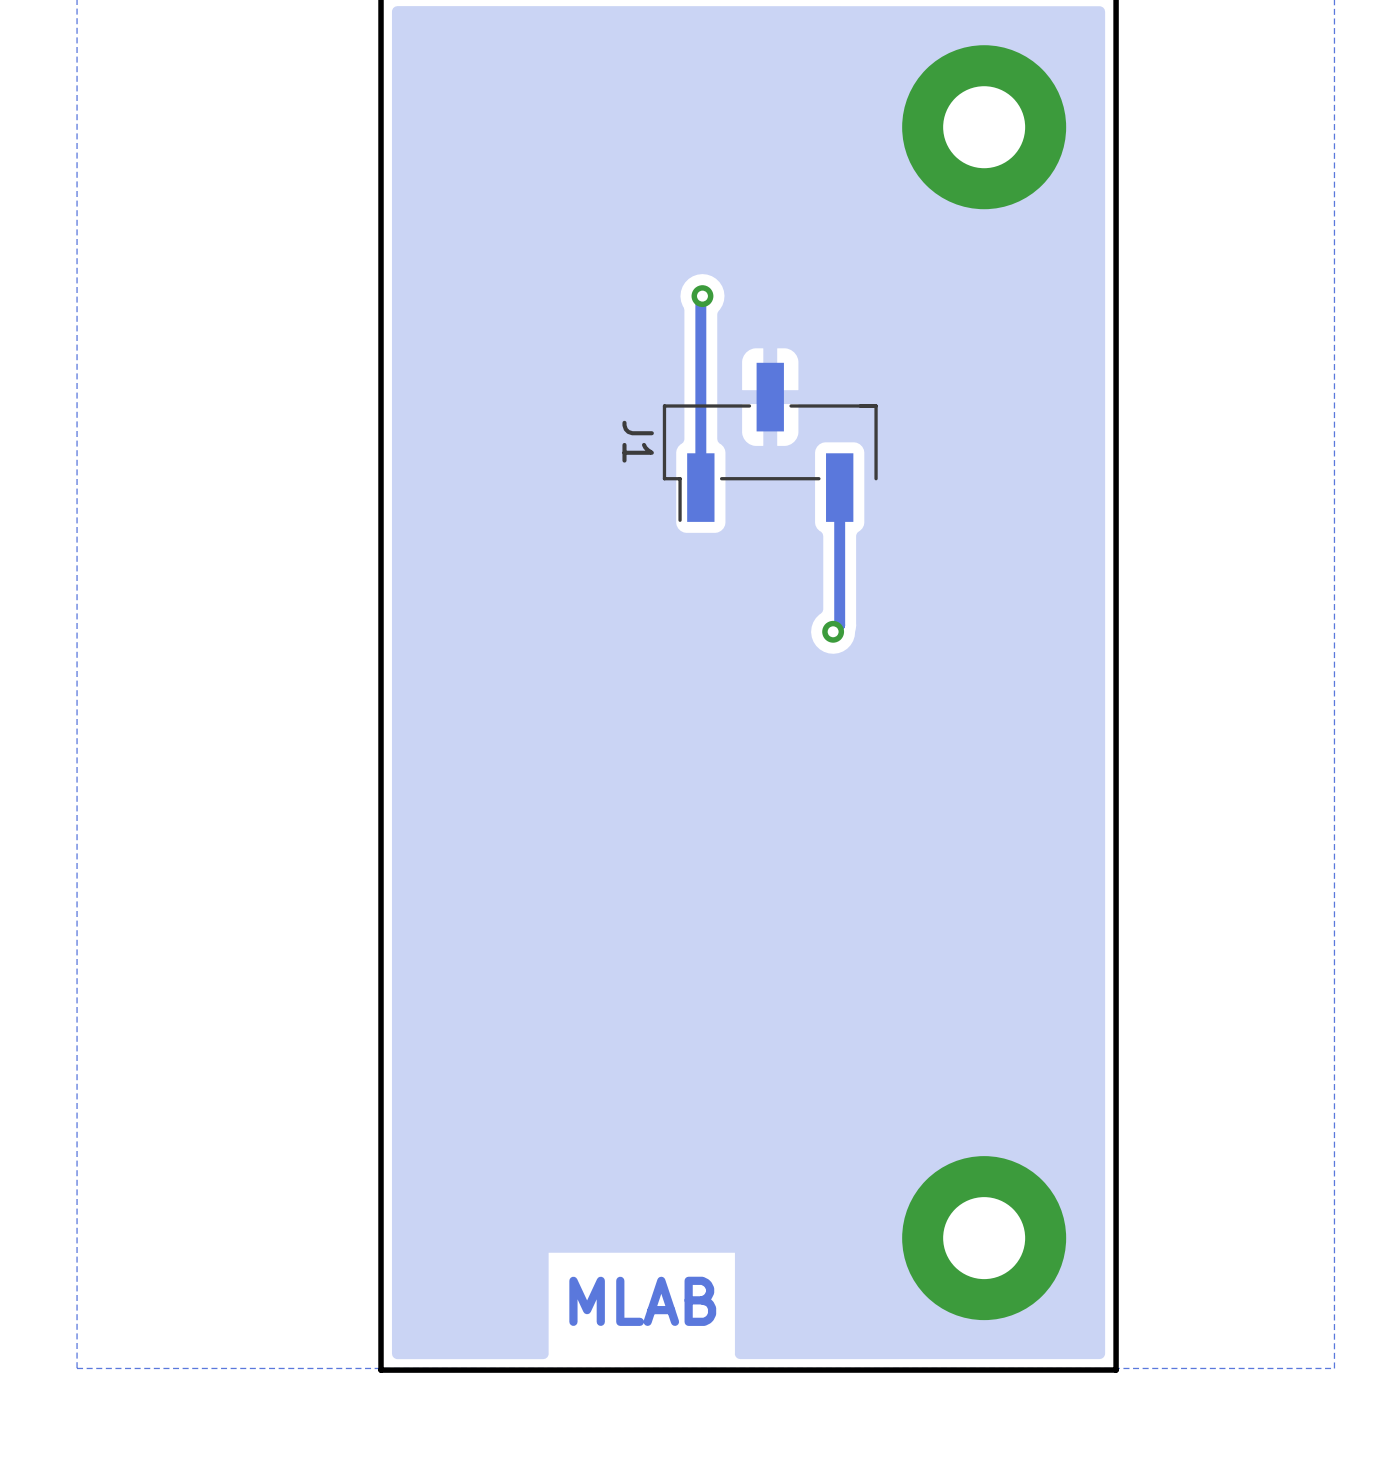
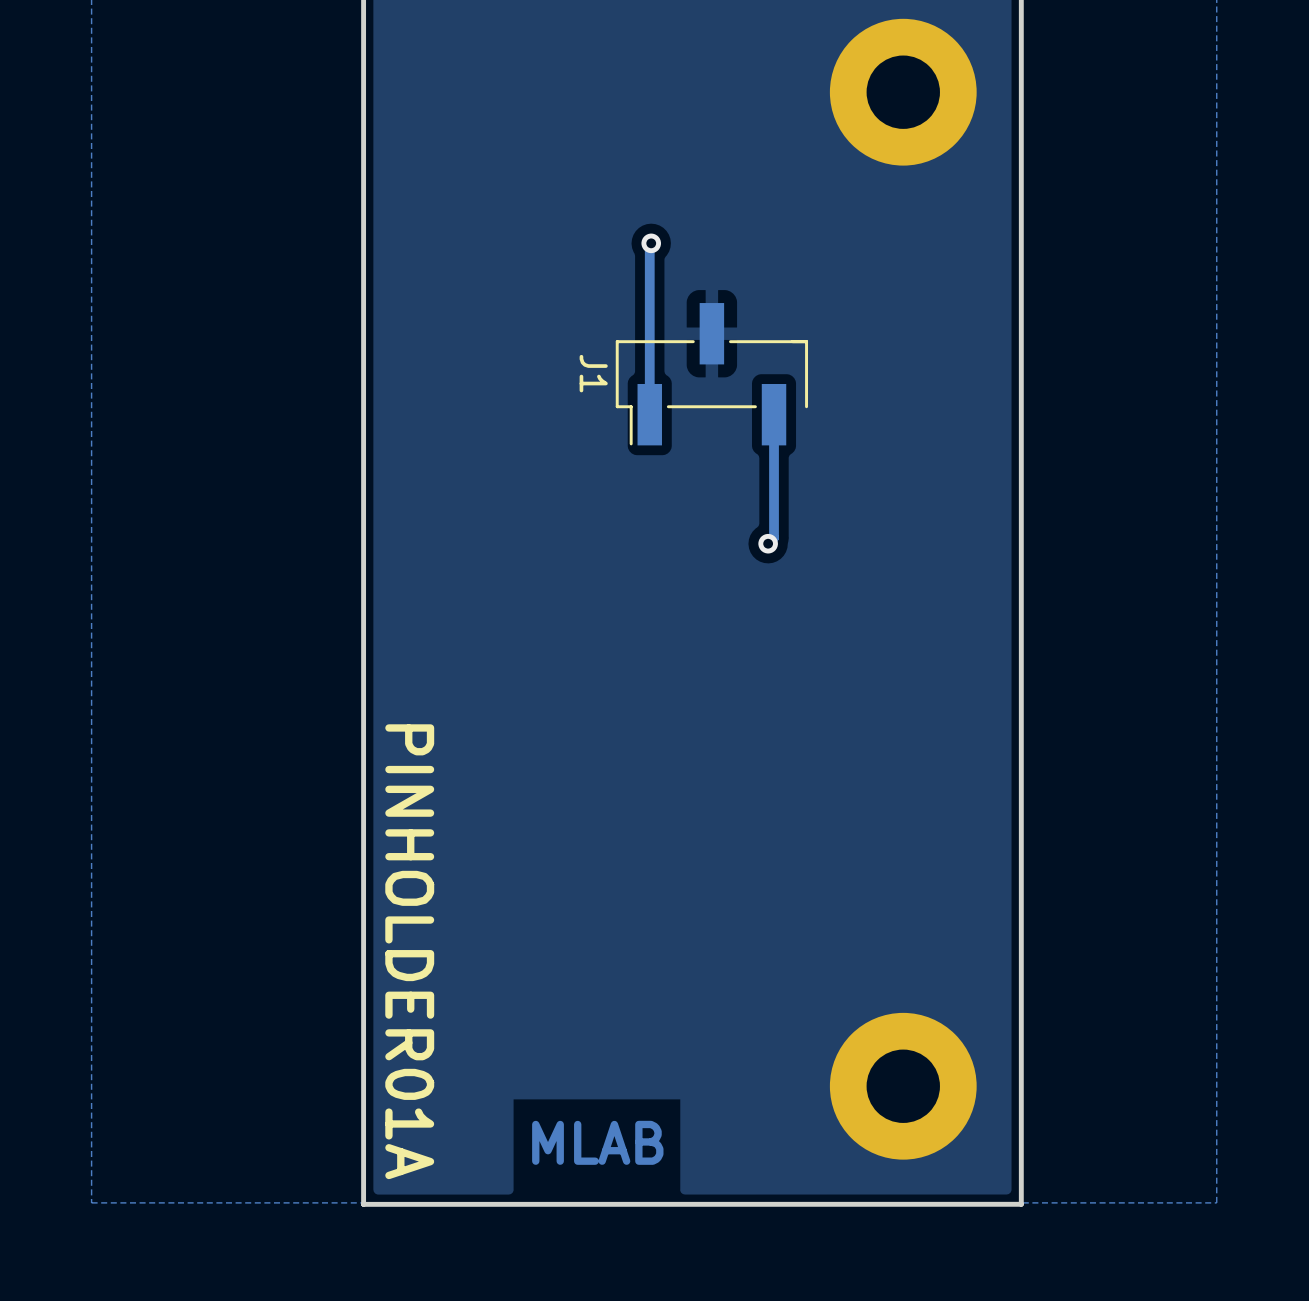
text: none -> PINHOLDER01A (409, 951)

